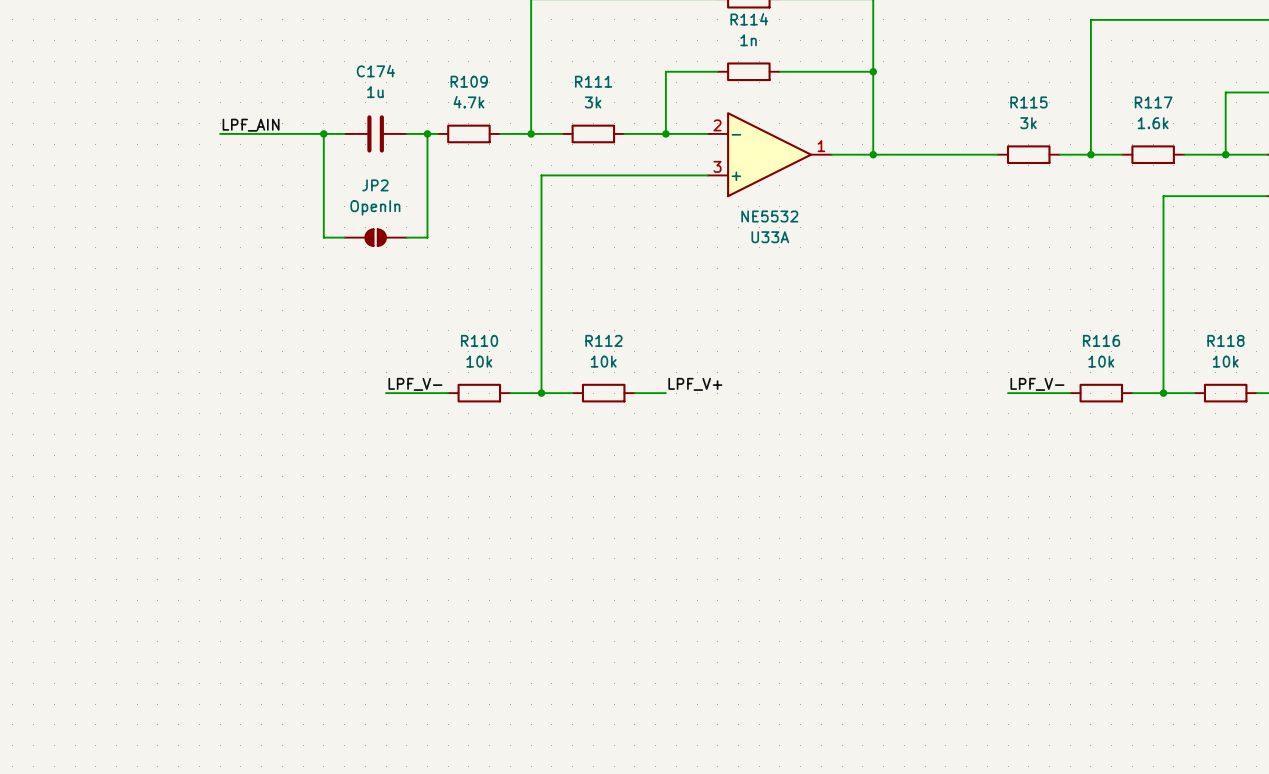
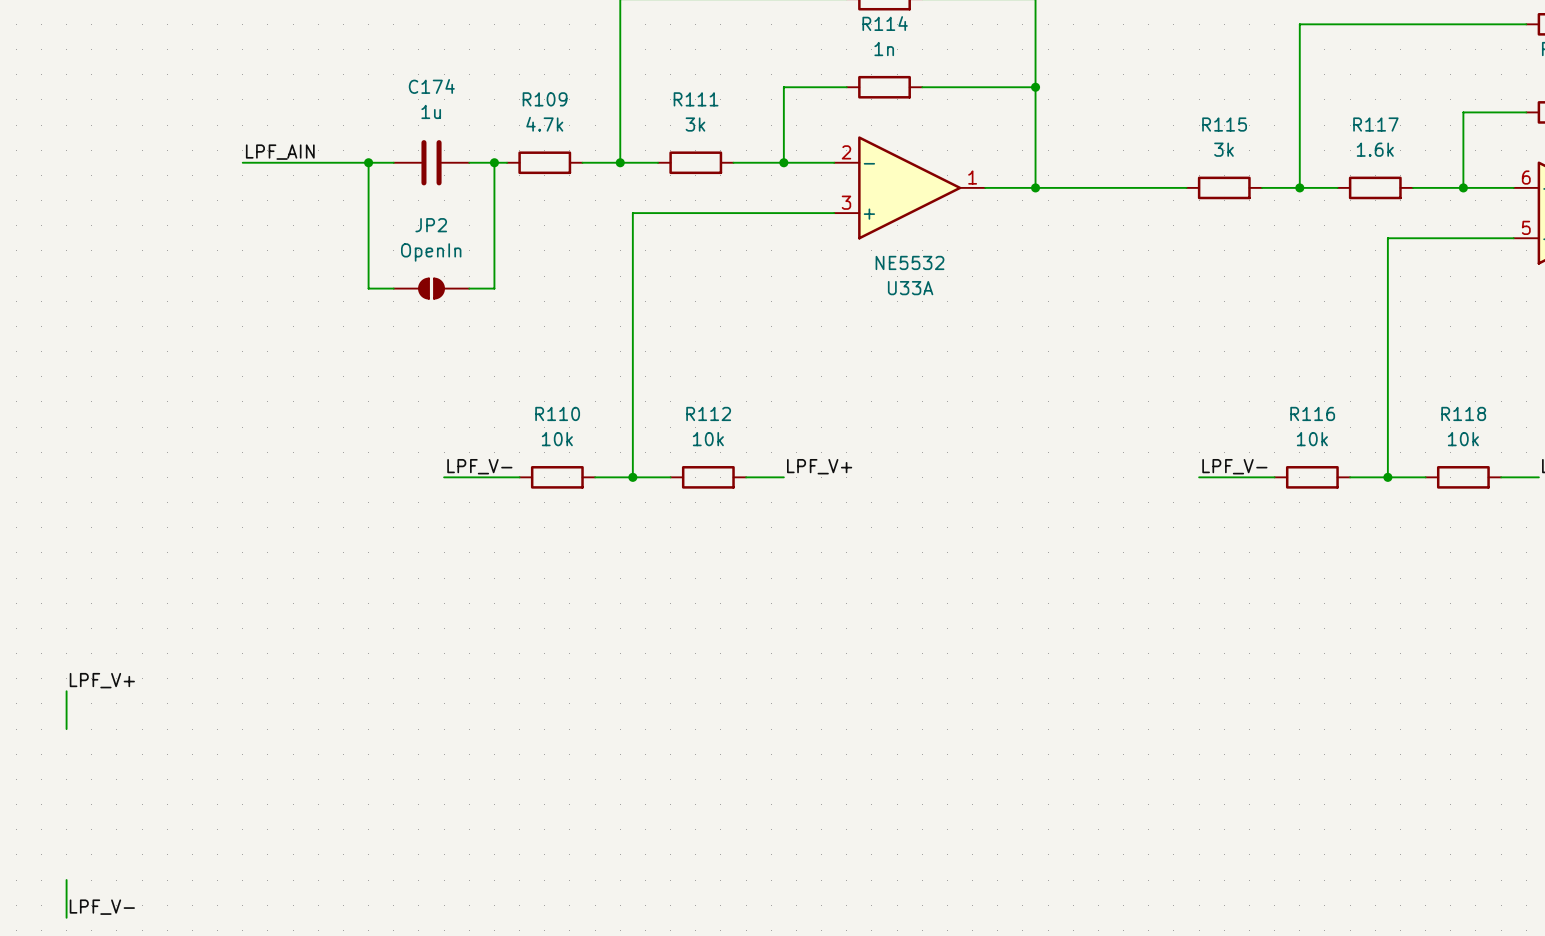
label: none -> LPF_V+ (102, 680)
wire: none -> (66, 691) (66, 729)
wire: none -> (66, 880) (66, 917)
label: none -> LPF_V- (102, 907)

